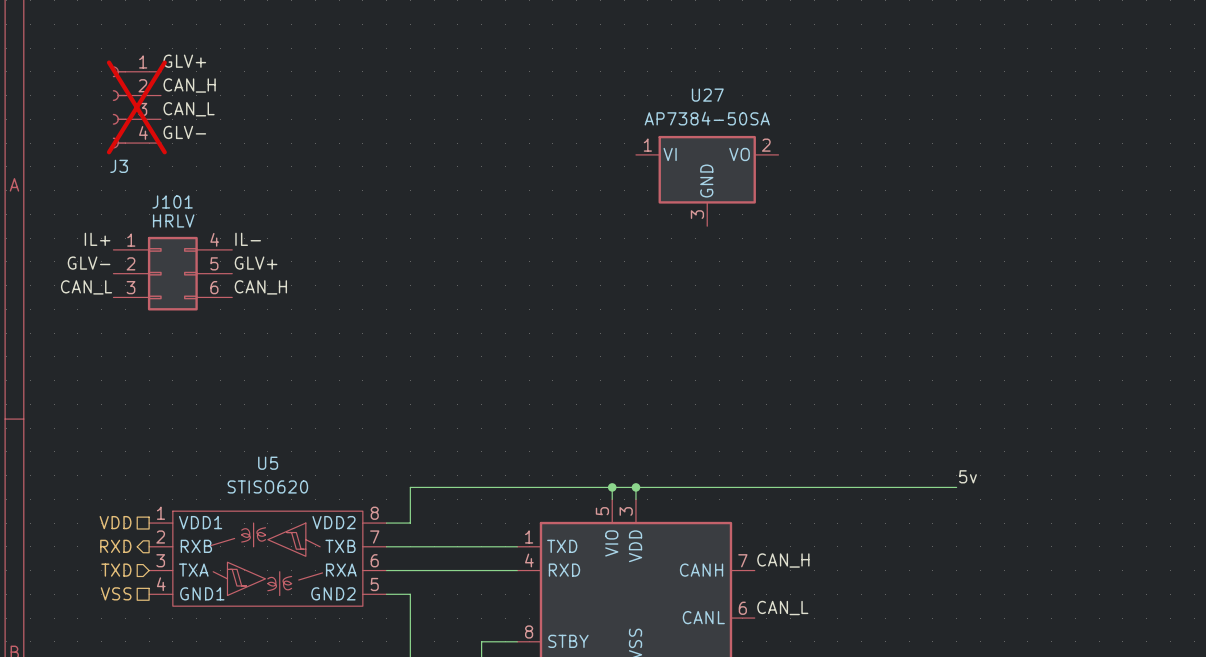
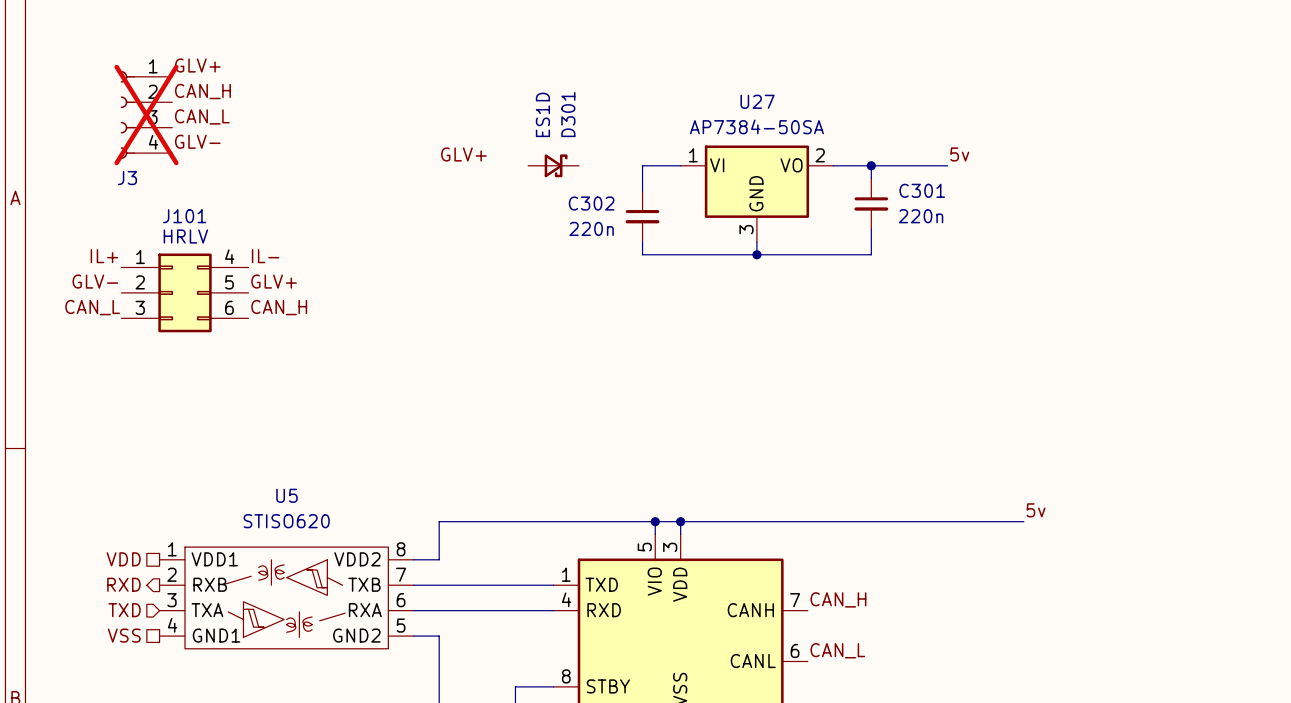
label: none -> GLV+ (463, 154)
label: none -> 5v (959, 154)
D301: none -> ES1D (553, 165)
wire: none -> (680, 165) (642, 165) (642, 191)
wire: none -> (833, 165) (947, 165)
wire: none -> (871, 165) (871, 178)
junction: none -> (871, 165)
C301: none -> 220n (871, 203)
C302: none -> 220n (642, 216)
wire: none -> (871, 229) (871, 254) (642, 254) (642, 242)
wire: none -> (756, 242) (756, 254)
junction: none -> (756, 254)

